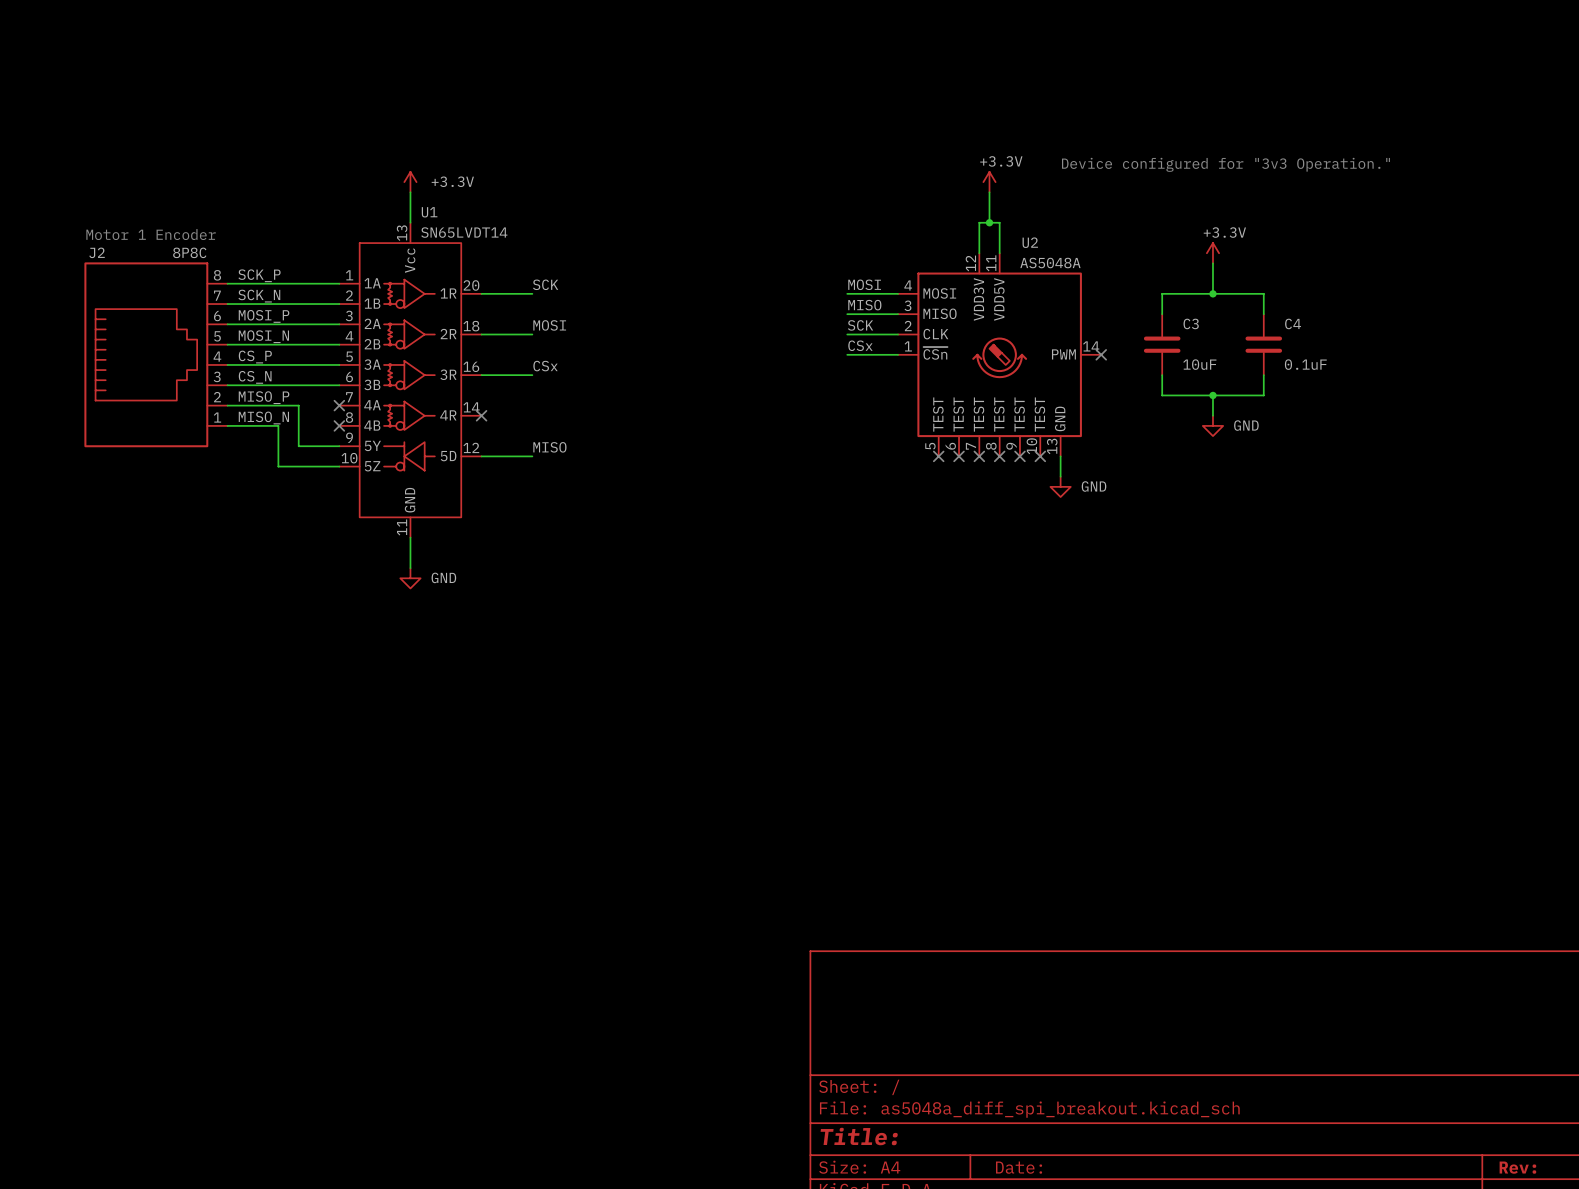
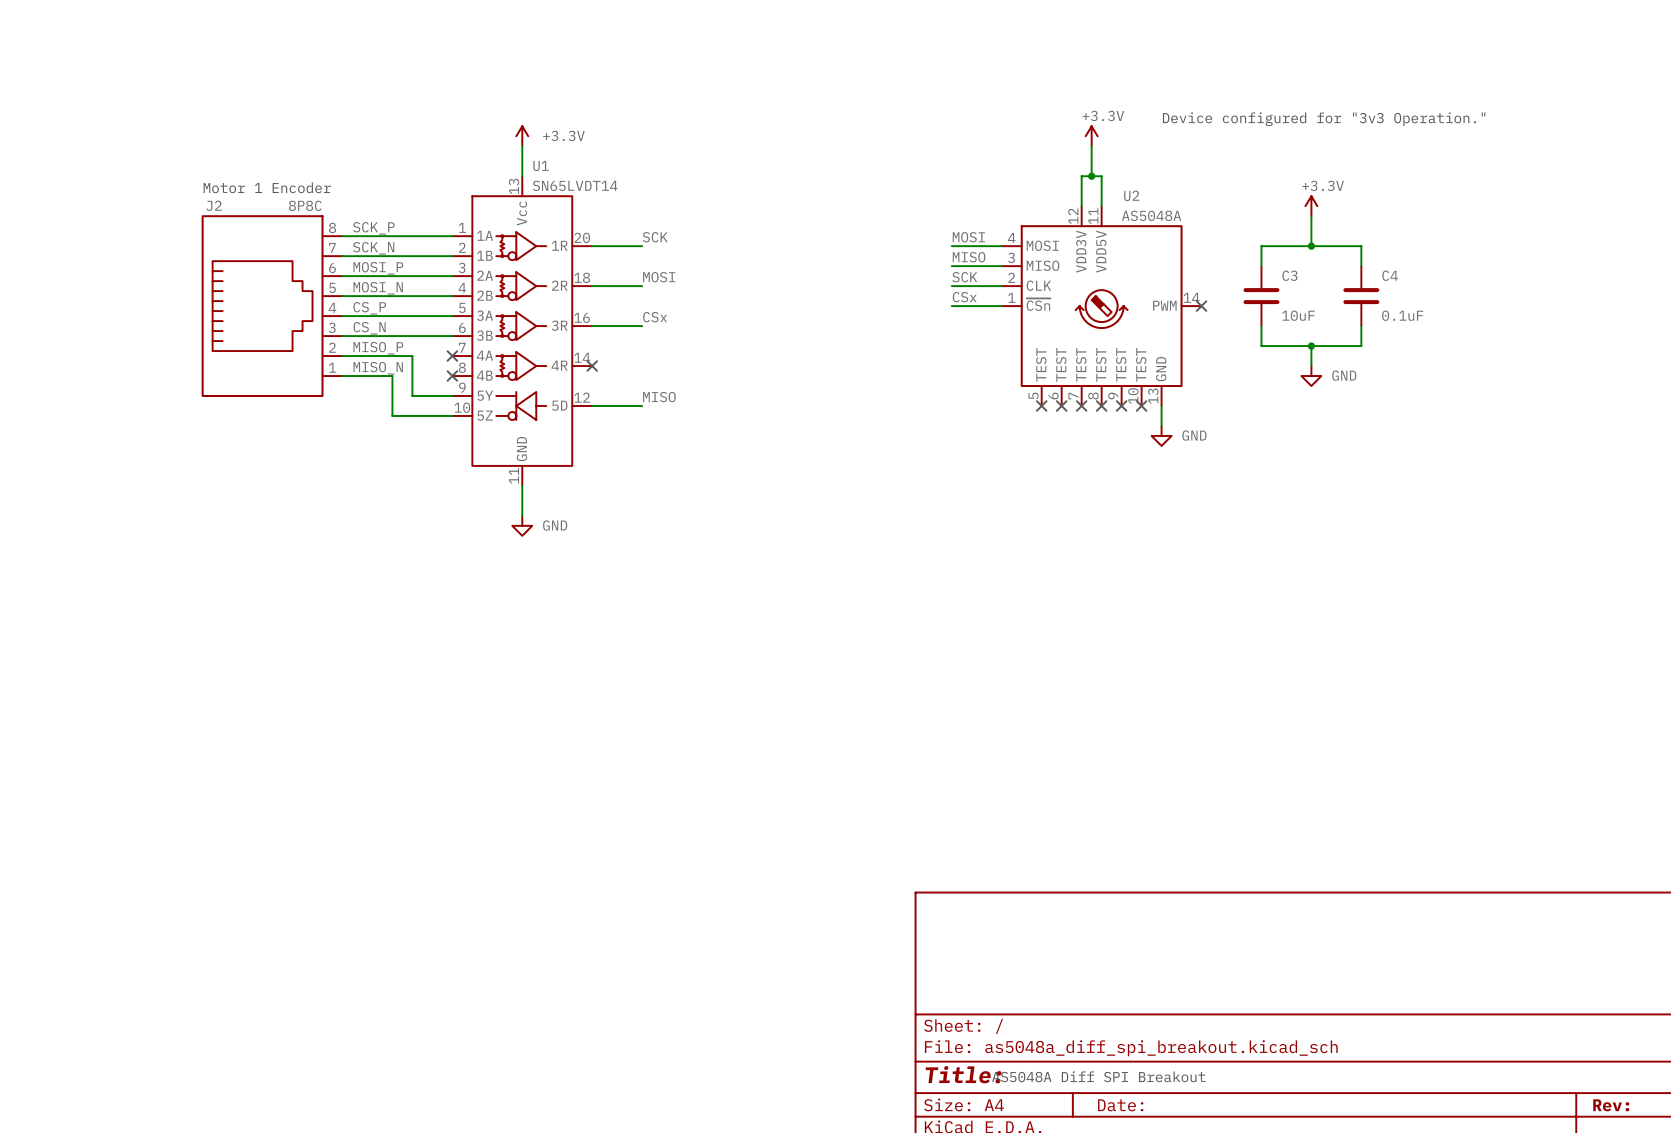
text: none -> AS5048A Diff SPI Breakout (1098, 1076)

